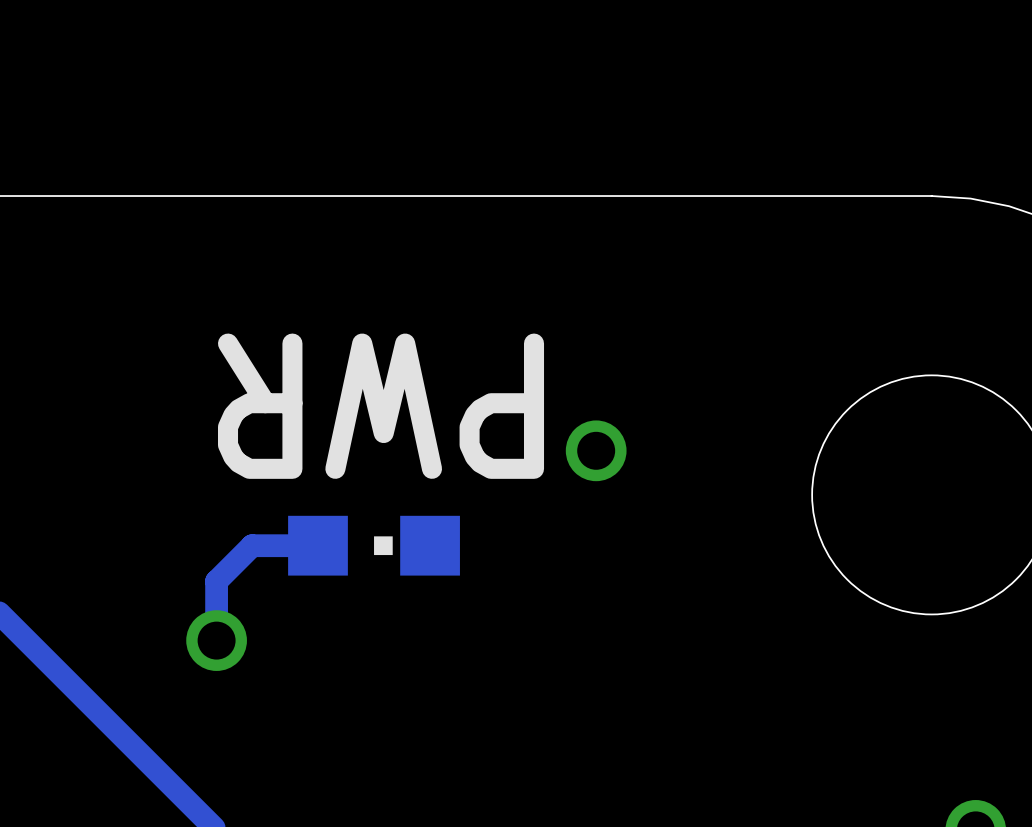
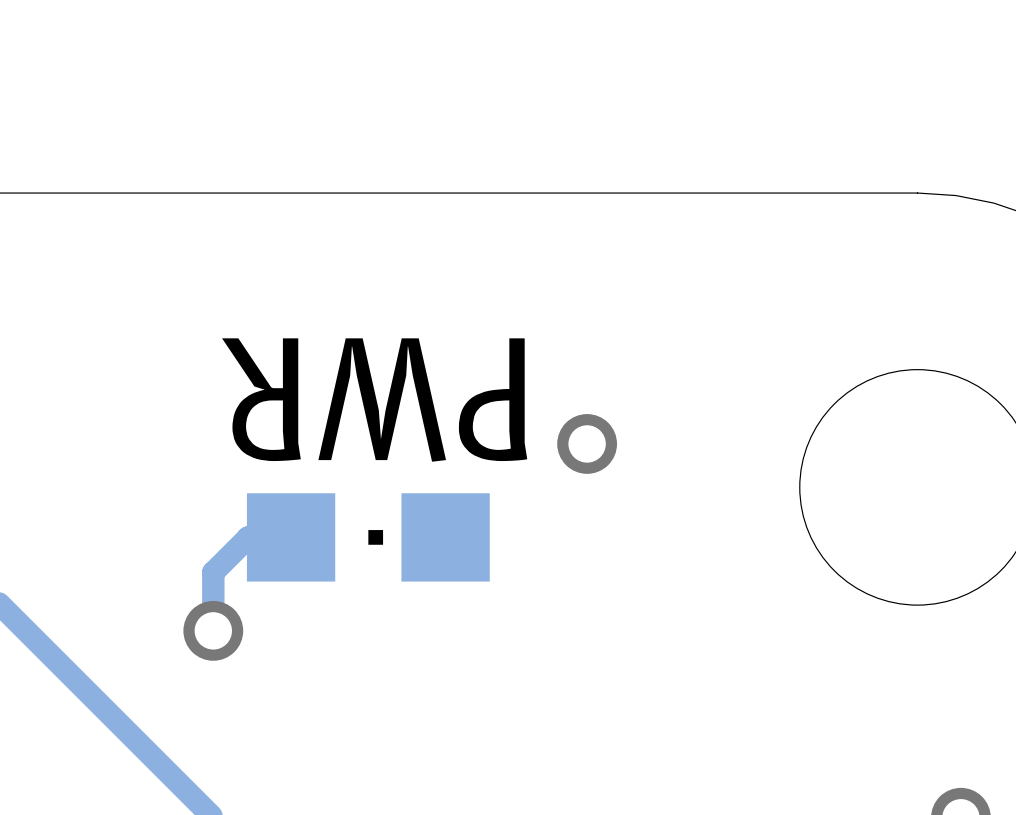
part footprint: [288, 515, 460, 576] -> [246, 493, 490, 582]

